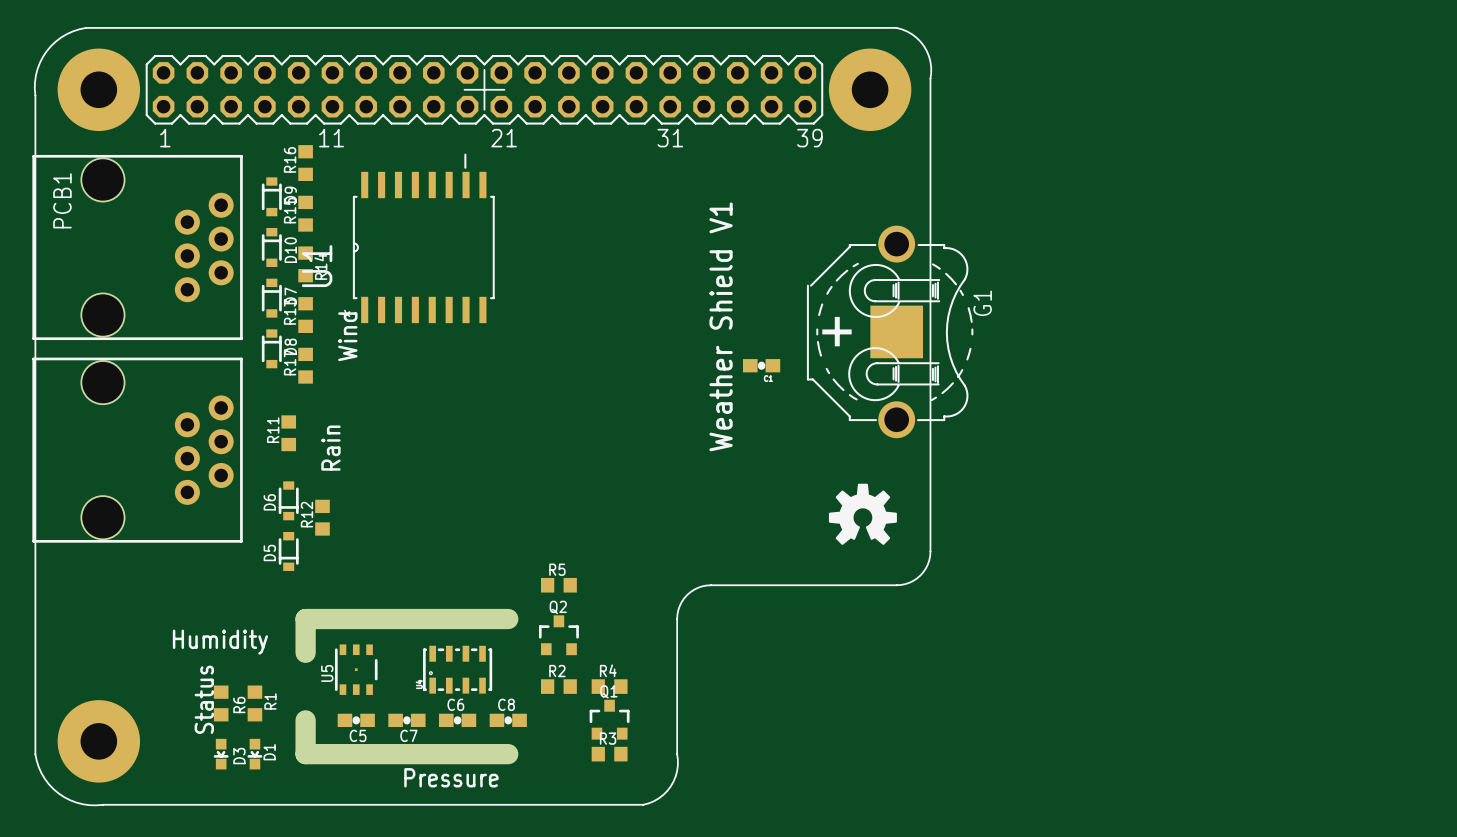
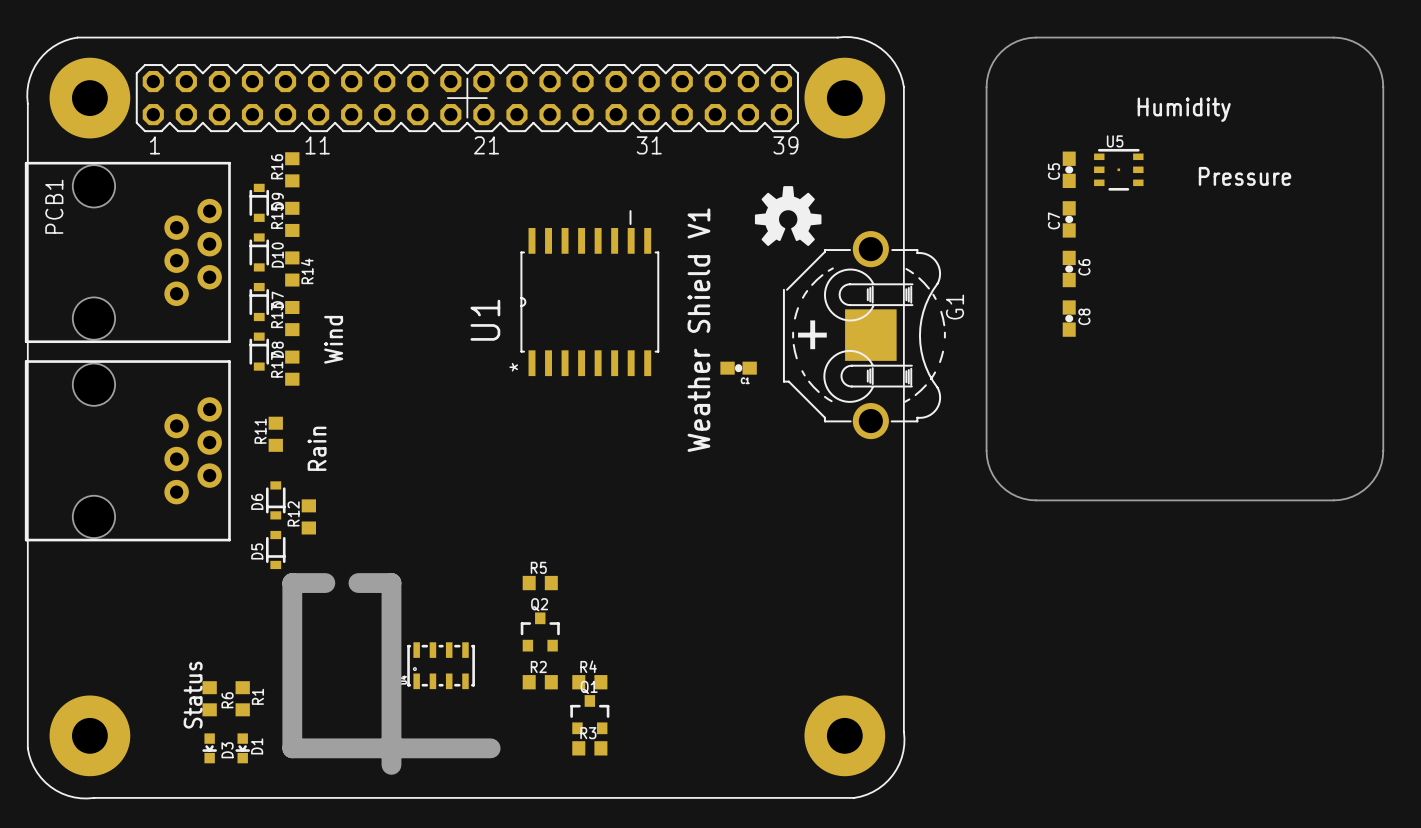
PCB1 footprint: [34, 27, 932, 806] -> [27, 36, 905, 799]
board edge: none -> (1036, 37) (1333, 37) (1346, 39) (1358, 44) (1373, 56) (1381, 74) (1383, 87) (1383, 450) (1381, 463) (1376, 475) (1363, 490) (1346, 498) (1333, 500) (1036, 500) (1023, 498) (1011, 493) (996, 480) (988, 463) (986, 450) (986, 80) (993, 62) (1001, 52) (1017, 41) (1036, 37)
text: none -> Humidity (1184, 109)
text: none -> Pressure (1244, 176)
U1 position: (423, 238) -> (589, 293)
drawing position: (862, 514) -> (788, 216)
board edge: none -> (358, 583) (391, 583) (391, 764)
board edge: (305, 619) (508, 619) -> (292, 616) (292, 583) (325, 583)
text: Humidity (220, 642) -> none
board edge: none -> (292, 649) (292, 715)
U5 rotation: 0° (356, 669) -> 90° clockwise (1118, 169)
U5 position: (356, 669) -> (1118, 169)
C5 rotation: 0° (356, 720) -> 90° clockwise (1069, 169)
C5 position: (356, 720) -> (1069, 169)
C7 rotation: 0° (406, 720) -> 90° clockwise (1069, 219)
C7 position: (406, 720) -> (1069, 219)
C6 rotation: 0° (457, 720) -> 90° clockwise (1069, 268)
C6 position: (457, 720) -> (1069, 268)
C8 rotation: 0° (508, 720) -> 90° clockwise (1069, 318)
C8 position: (508, 720) -> (1069, 318)
text: Pressure (451, 777) -> none

